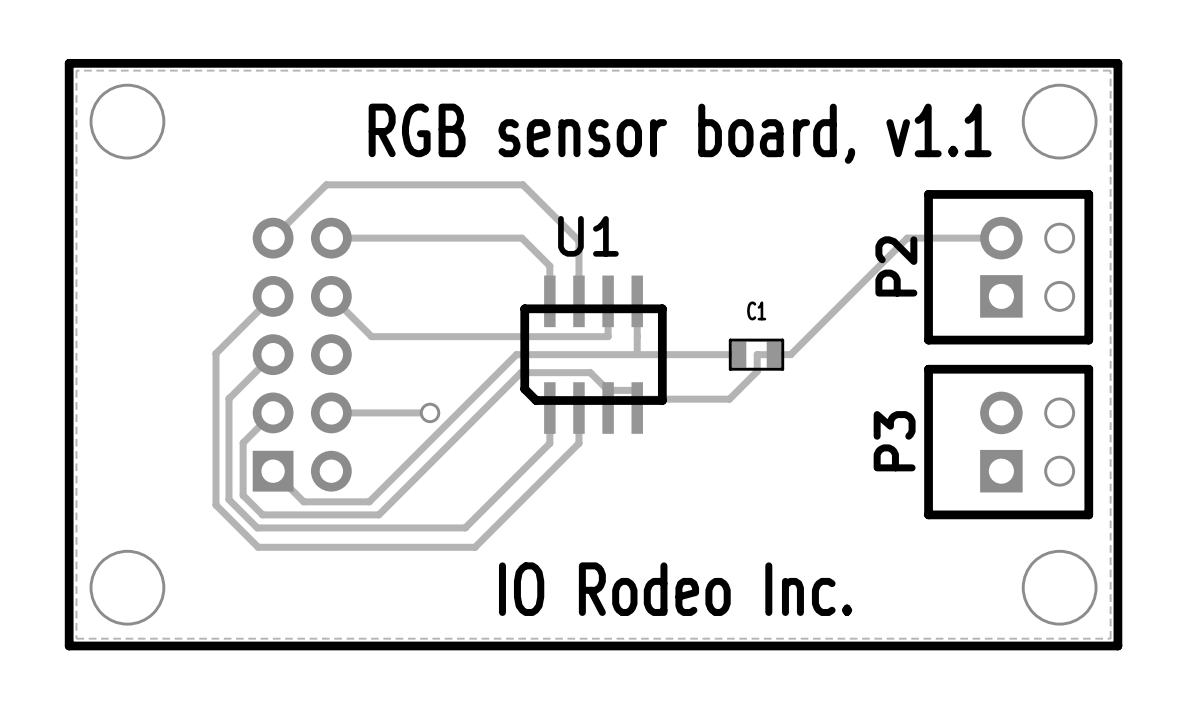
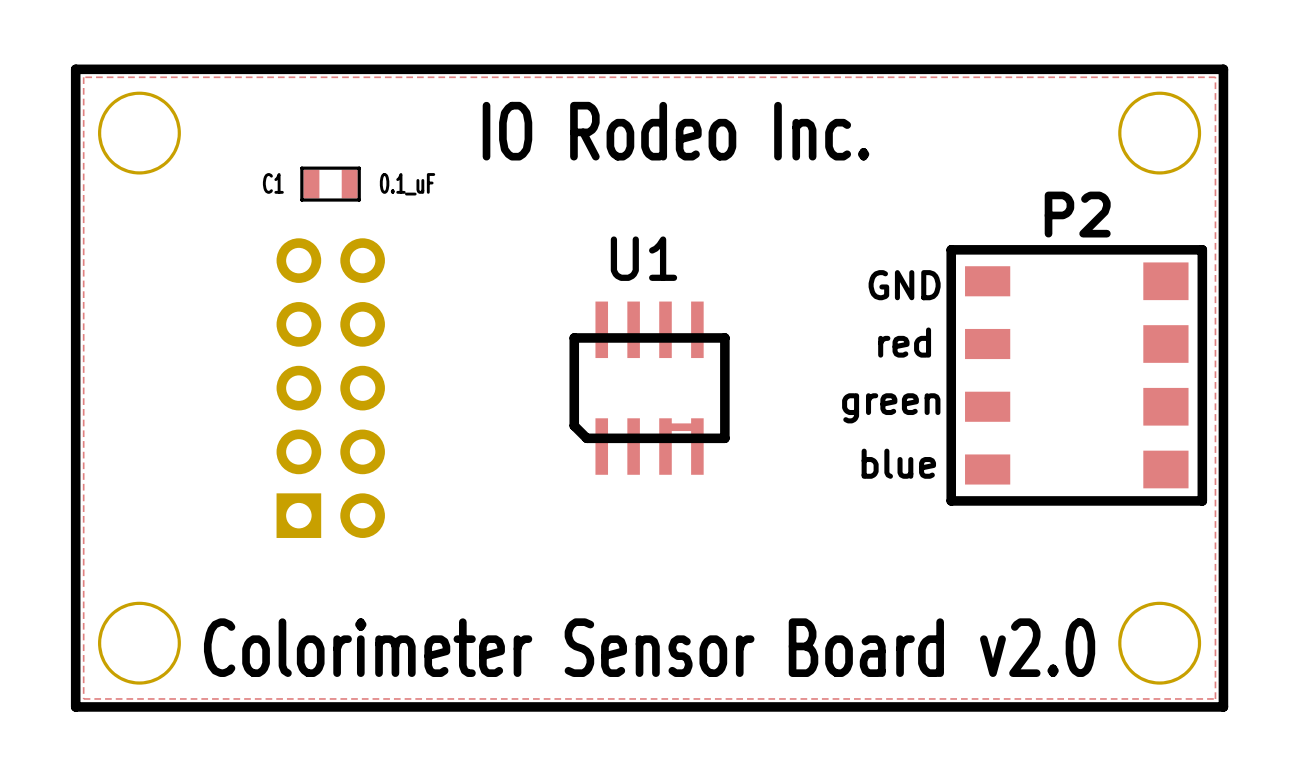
text: RGB sensor board, v1.1 (680, 133) -> none
C1 value: none -> 0.1_uF (407, 184)
P2 footprint: [924, 190, 1094, 345] -> [946, 245, 1208, 506]
track: (273, 238) (326, 184) (522, 184) (578, 240) (578, 301) -> none
track: (331, 238) (521, 238) (549, 266) (549, 301) -> none
track: (1001, 238) (907, 238) (790, 354) (757, 354) (757, 371) (729, 399) (637, 399) -> none
text: none -> GND (904, 285)
P2 name position: P2 (896, 266) -> P2 (1077, 214)
track: (273, 296) (215, 353) (215, 505) (258, 547) (475, 547) (578, 443) (578, 408) -> none
track: (331, 296) (371, 336) (608, 336) (608, 301) -> none
track: (637, 301) (637, 354) -> none
C1 name position: C1 (756, 310) -> C1 (273, 183)
text: none -> red (904, 342)
track: (273, 354) (228, 398) (228, 499) (257, 527) (465, 527) (549, 443) (549, 408) -> none
track: (739, 354) (516, 354) (369, 501) (303, 501) (273, 471) -> none
C1 position: (756, 354) -> (330, 184)
text: none -> green (891, 408)
track: (608, 408) (608, 390) (590, 372) (521, 372) (378, 514) (262, 514) (243, 495) (243, 442) (273, 412) -> none
track: (331, 412) (430, 412) -> none
via: (430, 412) -> none
text: none -> blue (898, 463)
P3: (1008, 442) -> none
text position: IO Rodeo Inc. (675, 589) -> IO Rodeo Inc. (675, 131)
text: none -> Colorimeter Sensor Board v2.0 (649, 647)

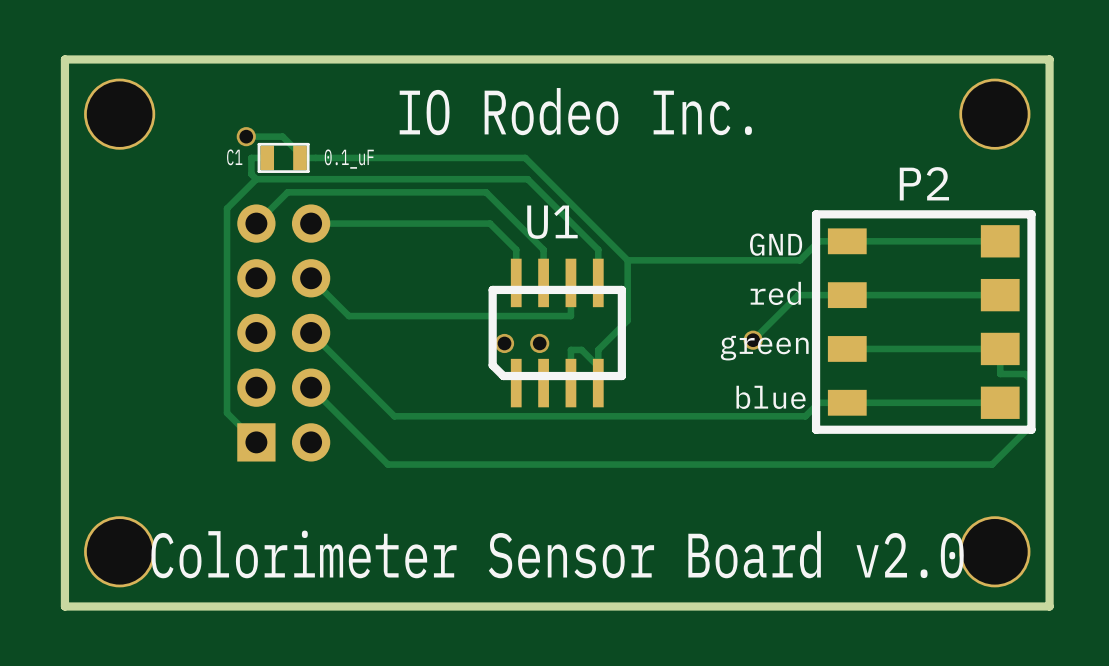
zone outline: (83, 77) (1215, 77) (1215, 698) (83, 698) (83, 77) -> none
track: none -> (246, 136) (282, 136) (303, 157)
via: none -> (246, 136)
track: none -> (267, 157) (251, 157) (251, 174) (256, 179)
track: none -> (300, 157) (525, 157) (627, 260)
track: none -> (256, 179) (227, 208) (227, 413) (256, 442)
track: none -> (256, 179) (527, 179) (598, 249) (598, 282)
track: none -> (256, 223) (287, 192) (486, 192) (543, 249) (543, 282)
track: none -> (311, 223) (490, 223) (516, 249) (516, 282)
track: none -> (1000, 241) (818, 241) (799, 260) (627, 260)
track: none -> (627, 260) (627, 320) (598, 349) (598, 366) (581, 349) (570, 349) (570, 383)
track: none -> (311, 278) (348, 316) (570, 316) (570, 282)
track: none -> (1000, 295) (798, 295) (753, 340)
track: none -> (311, 332) (394, 416) (805, 416) (818, 402) (1000, 402)
via: none -> (753, 340)
via: none -> (504, 343)
via: none -> (539, 343)
track: none -> (847, 348) (1000, 348) (1000, 374) (1025, 374) (1030, 378) (1030, 426) (992, 464) (387, 464) (311, 387)
track: (665, 427) (697, 427) -> none

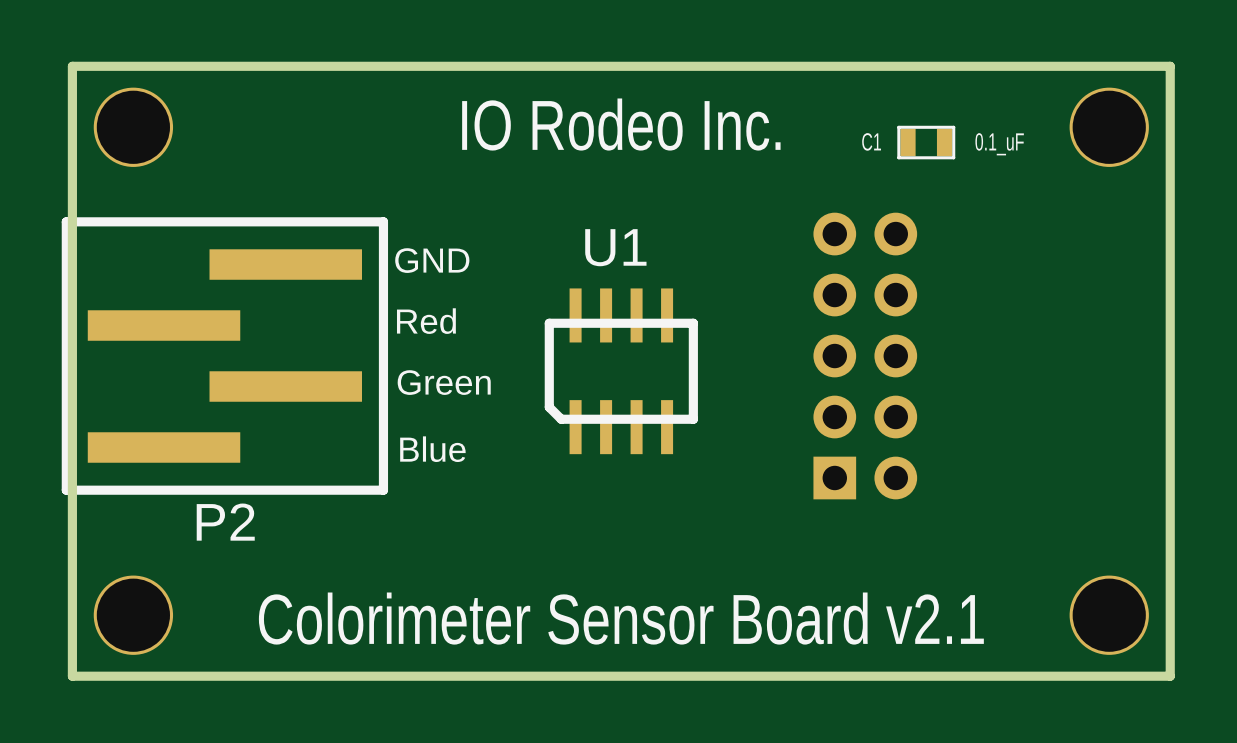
text position: IO Rodeo Inc. (575, 111) -> IO Rodeo Inc. (621, 124)
track: (246, 136) (282, 136) (303, 157) -> none
via: (246, 136) -> none
track: (267, 157) (251, 157) (251, 174) (256, 179) -> none
C1 position: (283, 157) -> (926, 142)
track: (300, 157) (525, 157) (627, 260) -> none
track: (256, 179) (227, 208) (227, 413) (256, 442) -> none
track: (256, 179) (527, 179) (598, 249) (598, 282) -> none
P2 name position: P2 (924, 183) -> P2 (225, 522)
P2 footprint: [811, 210, 1036, 434] -> [61, 217, 389, 495]
track: (256, 223) (287, 192) (486, 192) (543, 249) (543, 282) -> none
track: (311, 223) (490, 223) (516, 249) (516, 282) -> none
track: (1000, 241) (818, 241) (799, 260) (627, 260) -> none
text position: GND (776, 244) -> GND (432, 260)
track: (627, 260) (627, 320) (598, 349) (598, 383) -> none
track: (311, 278) (348, 316) (570, 316) (570, 282) -> none
text: none -> Red (426, 321)
text: red (775, 293) -> none
track: (1000, 295) (798, 295) (753, 340) -> none
part position: (283, 332) -> (865, 356)
track: (311, 332) (394, 416) (805, 416) (818, 402) (1000, 402) -> none
via: (753, 340) -> none
text: none -> Green (444, 382)
via: (504, 343) -> none
via: (539, 343) -> none
text: green (764, 348) -> none
track: (847, 348) (1000, 348) (1000, 374) (1025, 374) (1030, 378) (1030, 426) (992, 464) (387, 464) (311, 387) -> none
track: (598, 366) (581, 349) (570, 349) (570, 383) -> none
text: blue (771, 397) -> none
text: none -> Blue (432, 449)
text: Colorimeter Sensor Board v2.0 (557, 554) -> Colorimeter Sensor Board v2.1 (621, 618)

